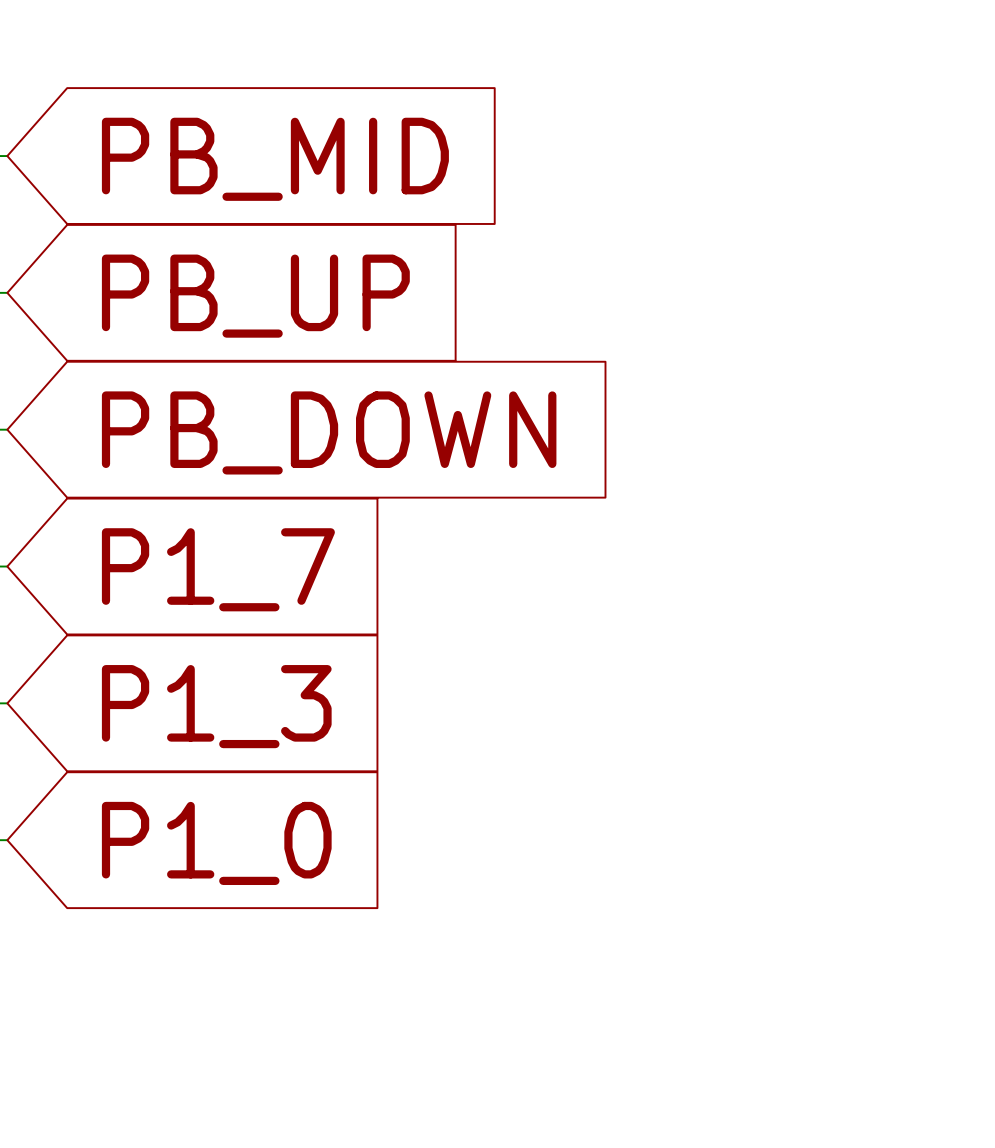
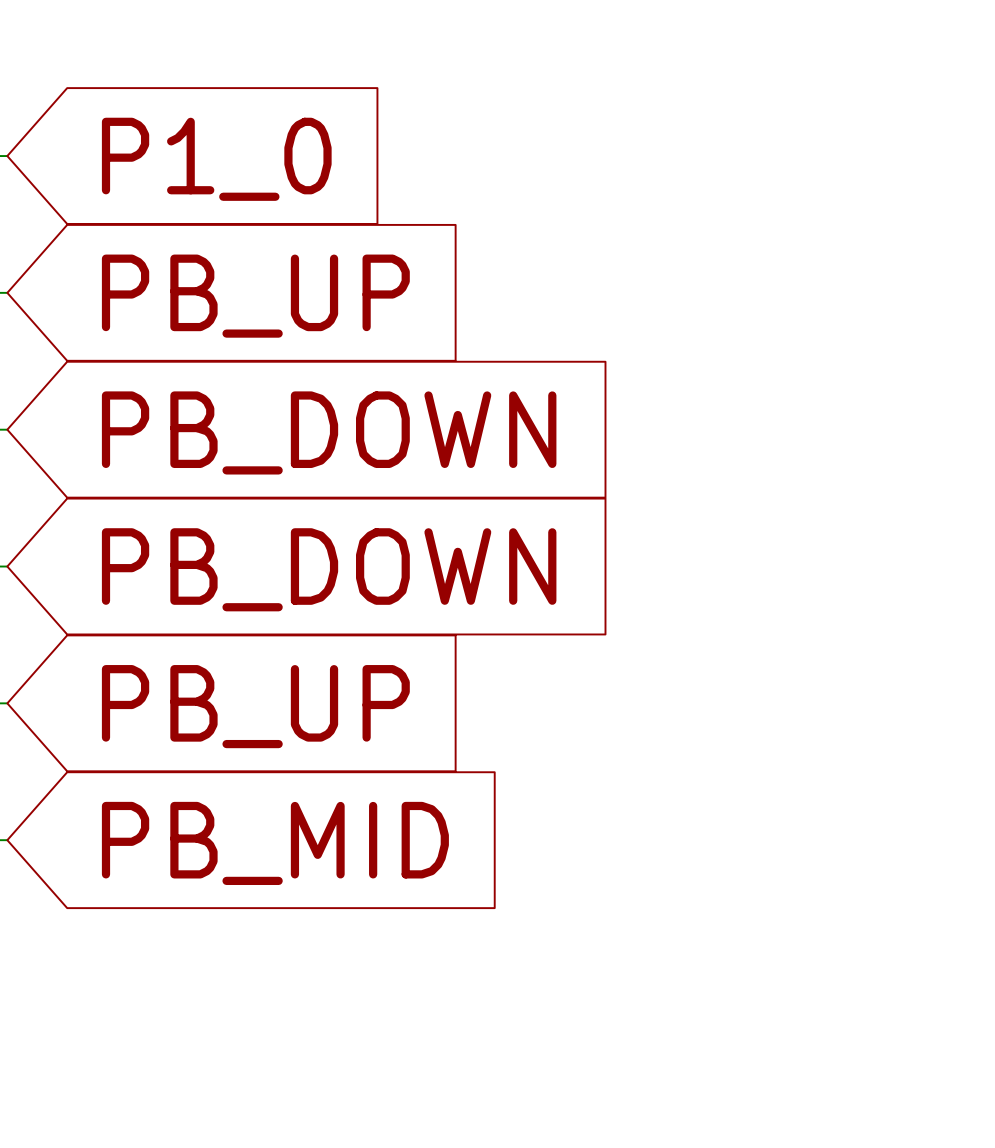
global label: PB_MID (275, 159) -> P1_0 (216, 159)
global label: P1_7 (218, 569) -> PB_DOWN (329, 569)
global label: P1_3 (216, 706) -> PB_UP (255, 706)
global label: P1_0 (216, 843) -> PB_MID (275, 843)

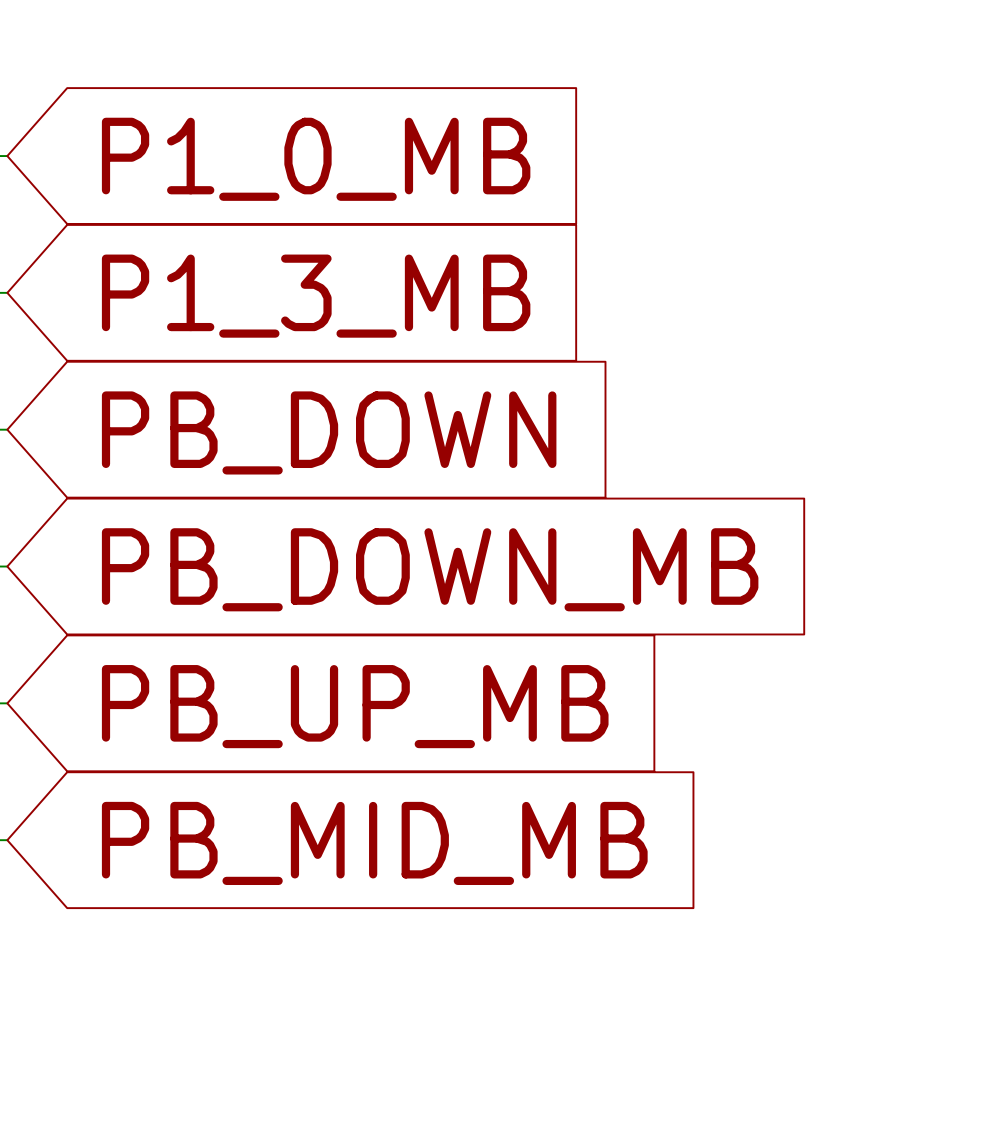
global label: P1_0 (216, 159) -> P1_0_MB (316, 159)
global label: PB_UP (255, 296) -> P1_3_MB (316, 296)
global label: PB_DOWN (329, 569) -> PB_DOWN_MB (430, 569)
global label: PB_UP (255, 706) -> PB_UP_MB (355, 706)
global label: PB_MID (275, 843) -> PB_MID_MB (374, 843)

